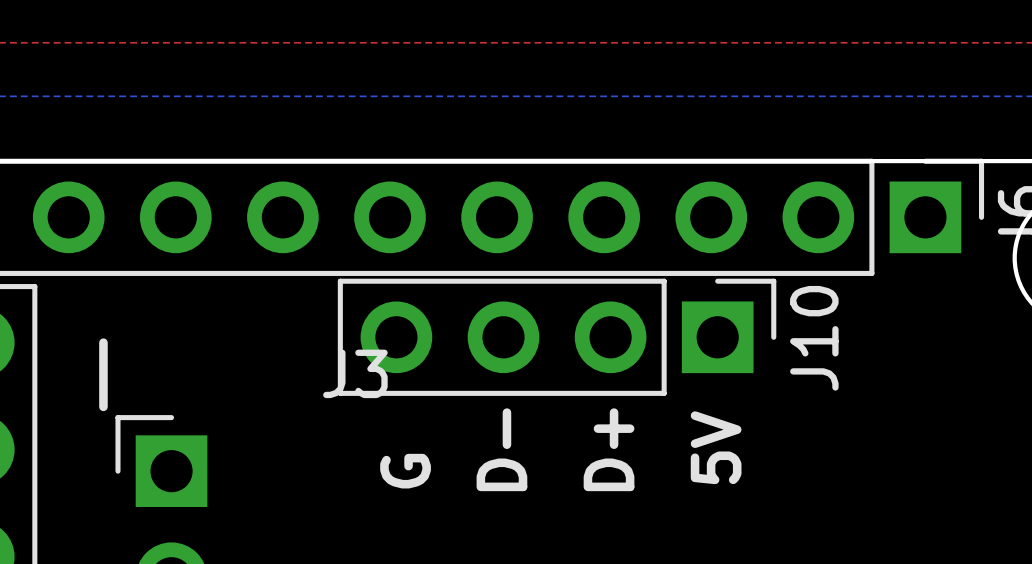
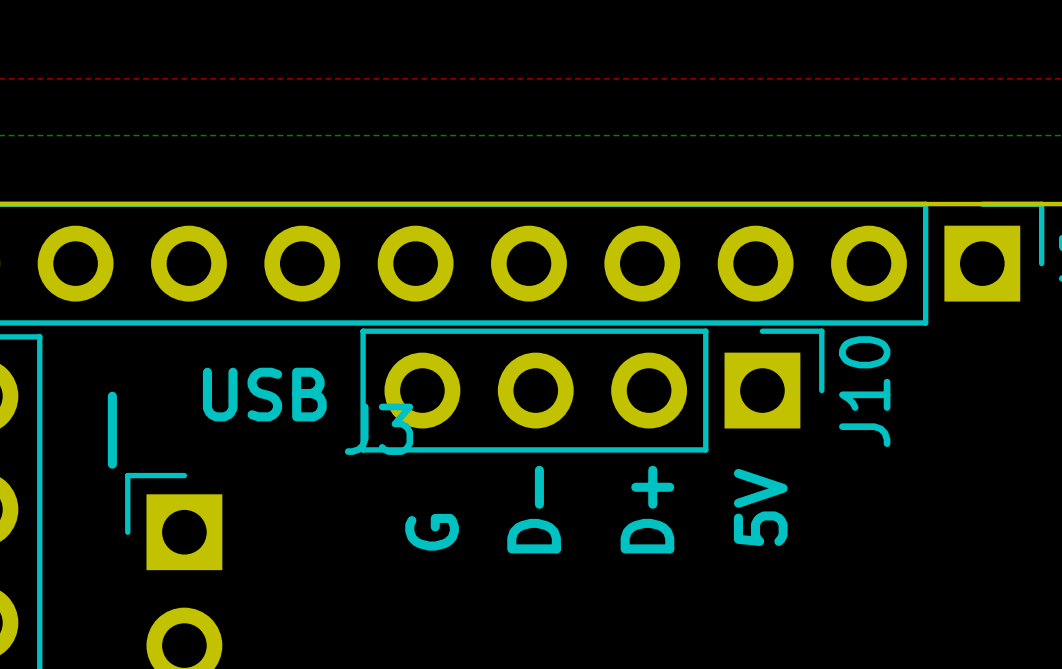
text: none -> USB (264, 394)

